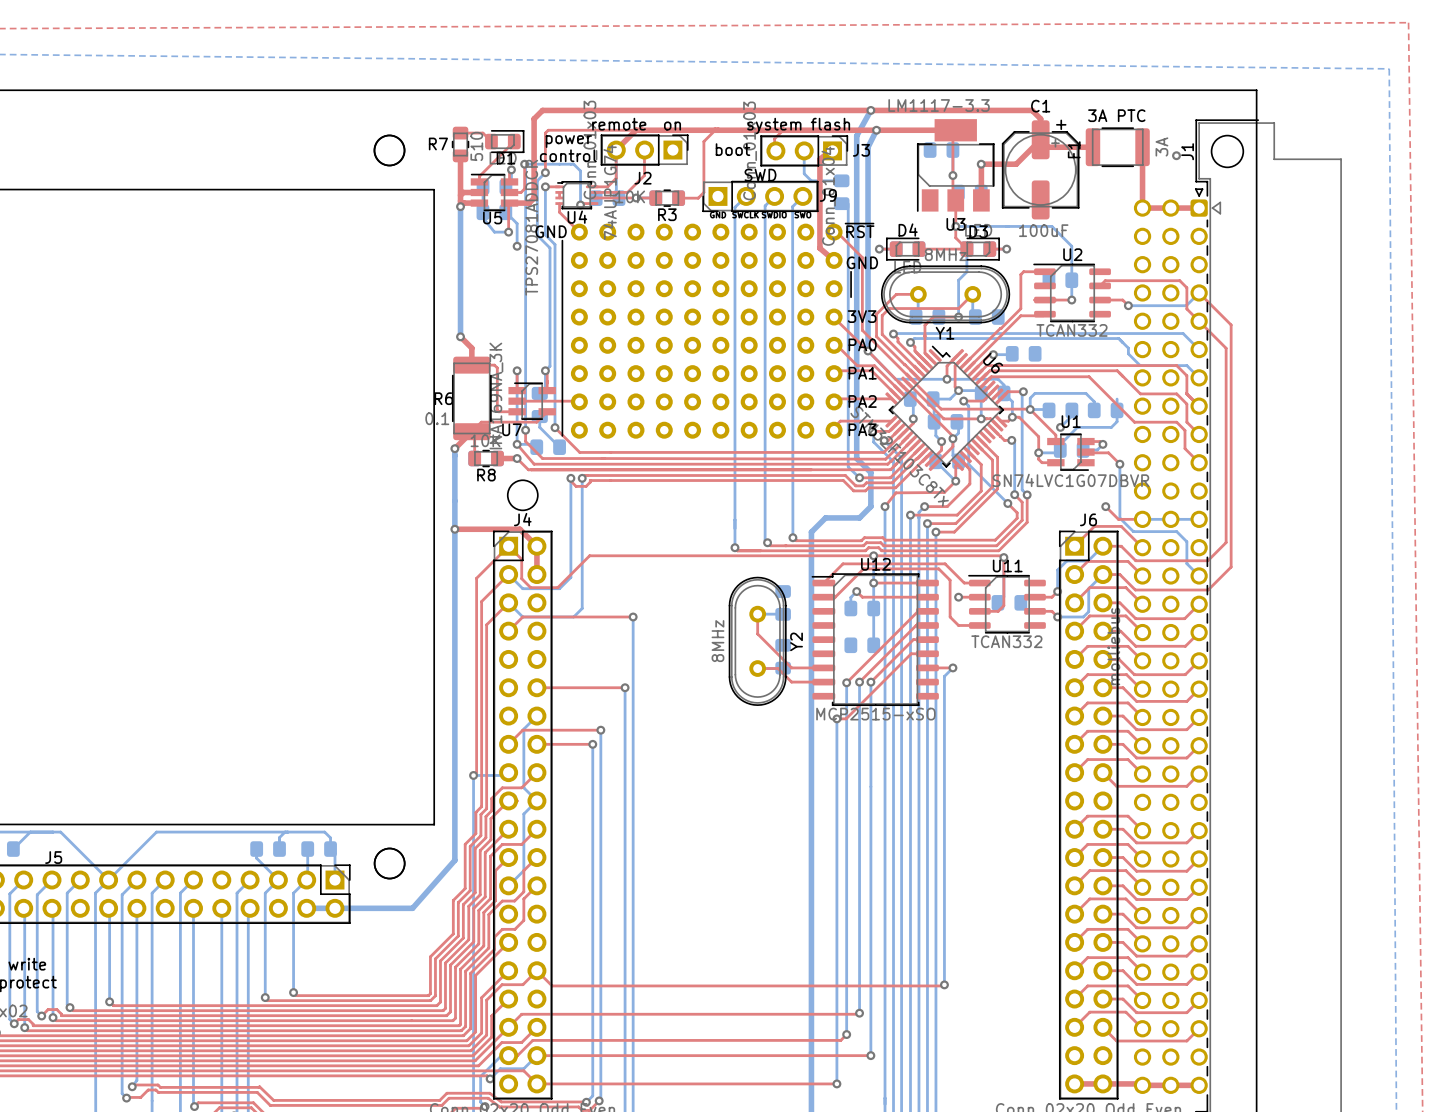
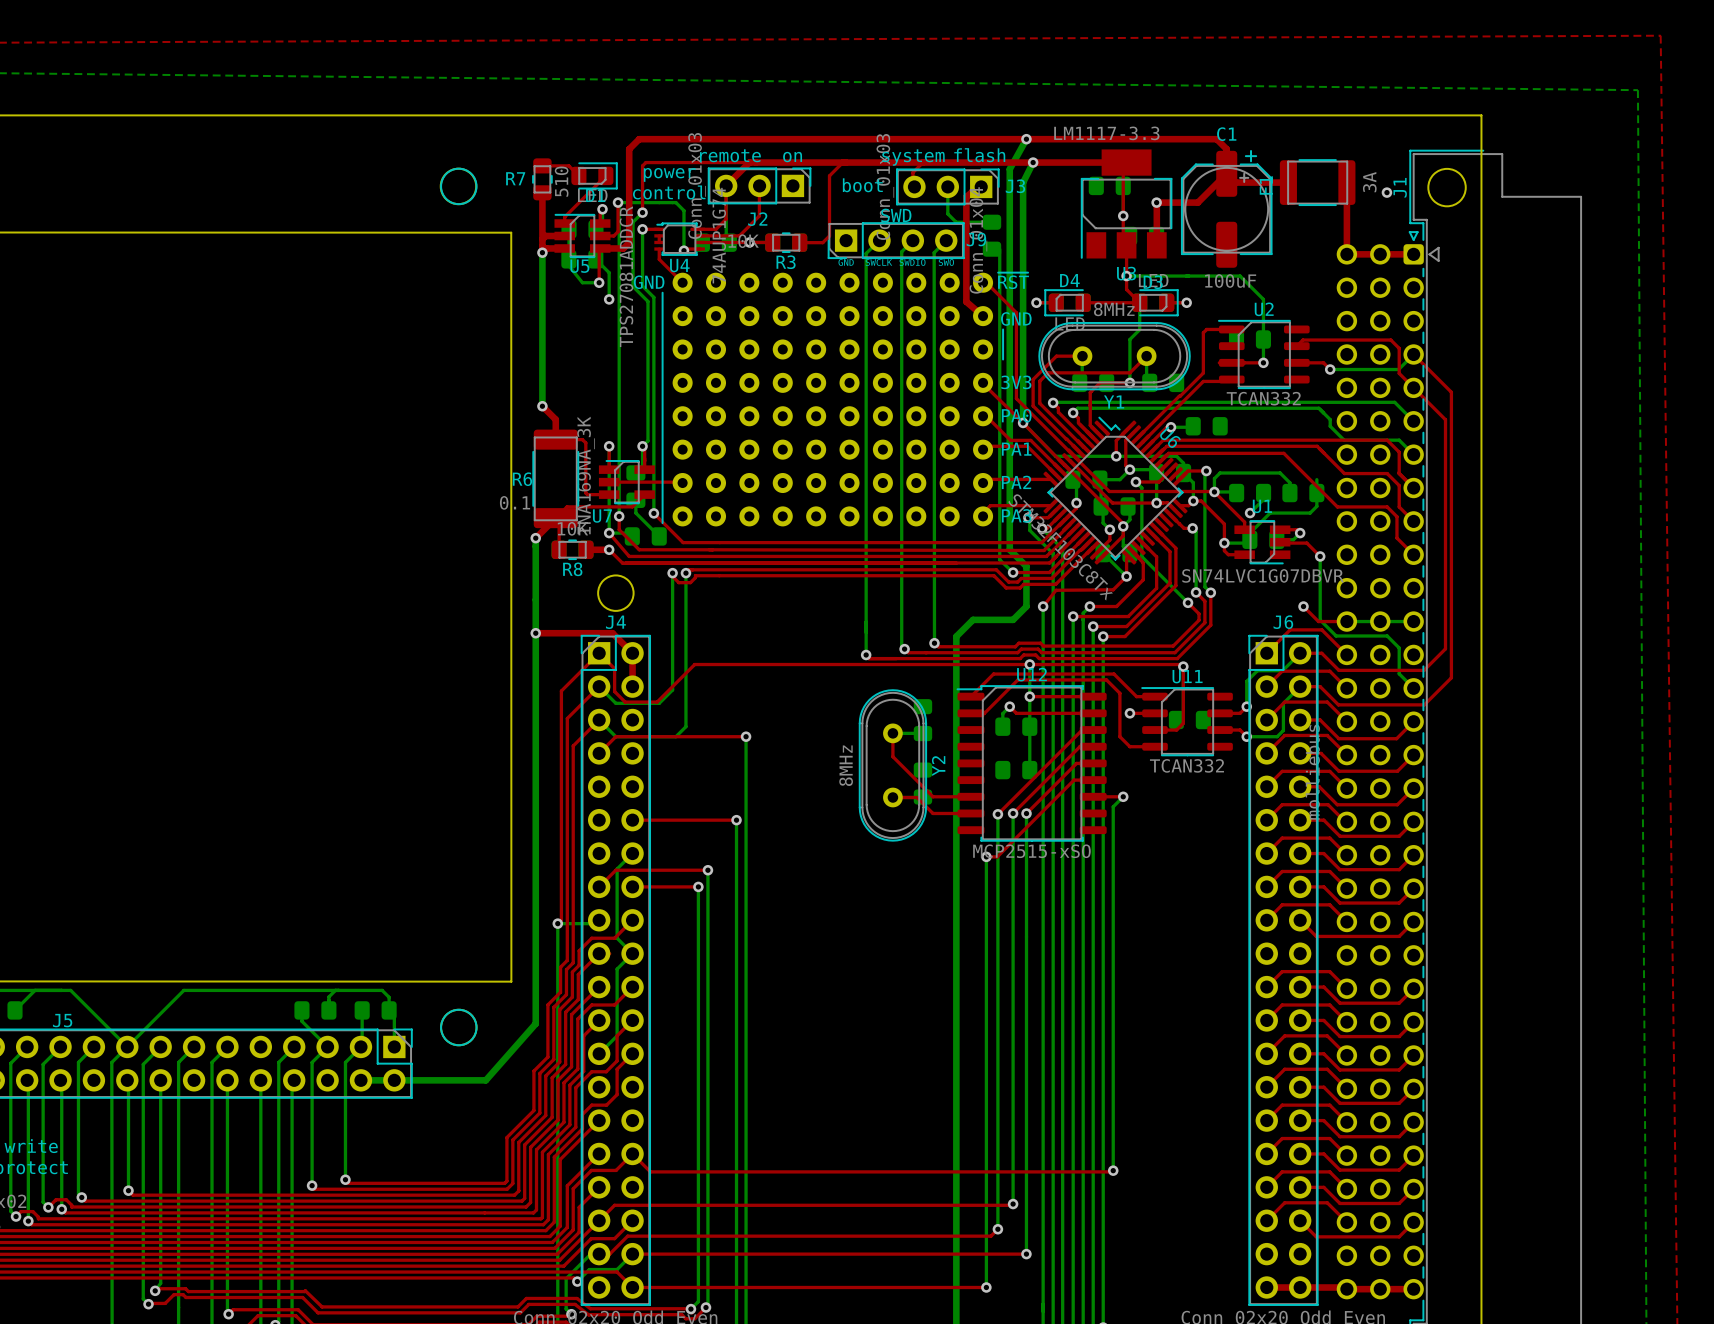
text: 3A PTC (1116, 115) -> none

